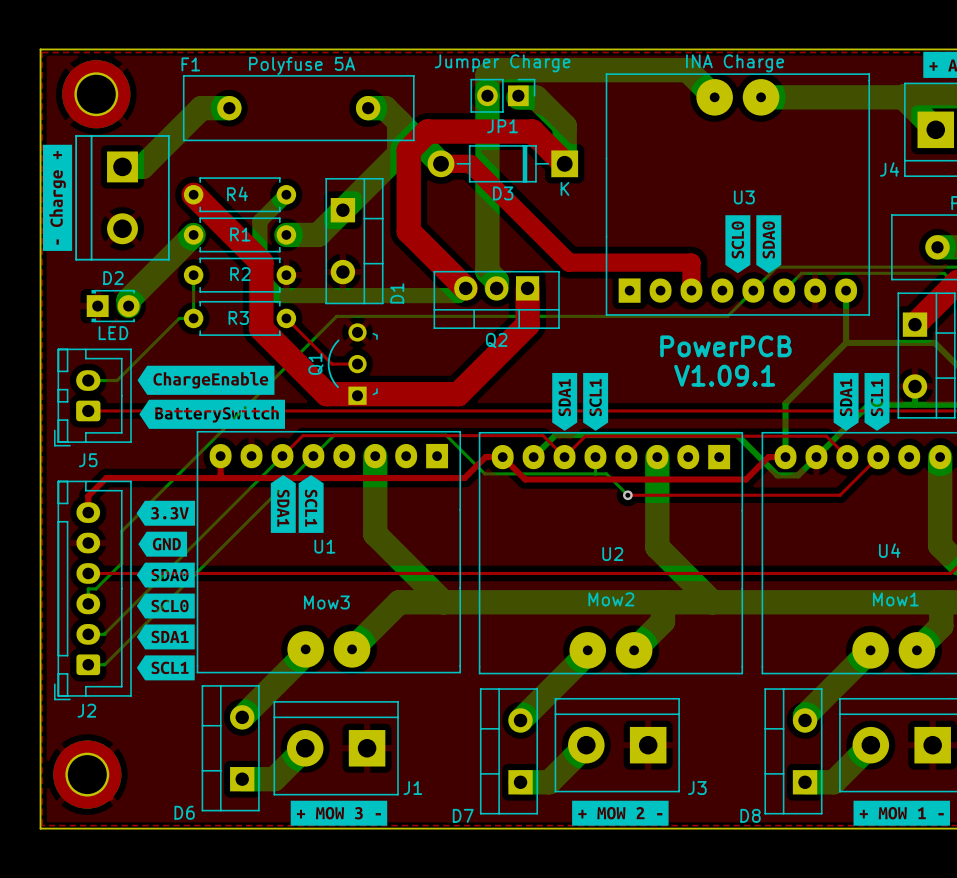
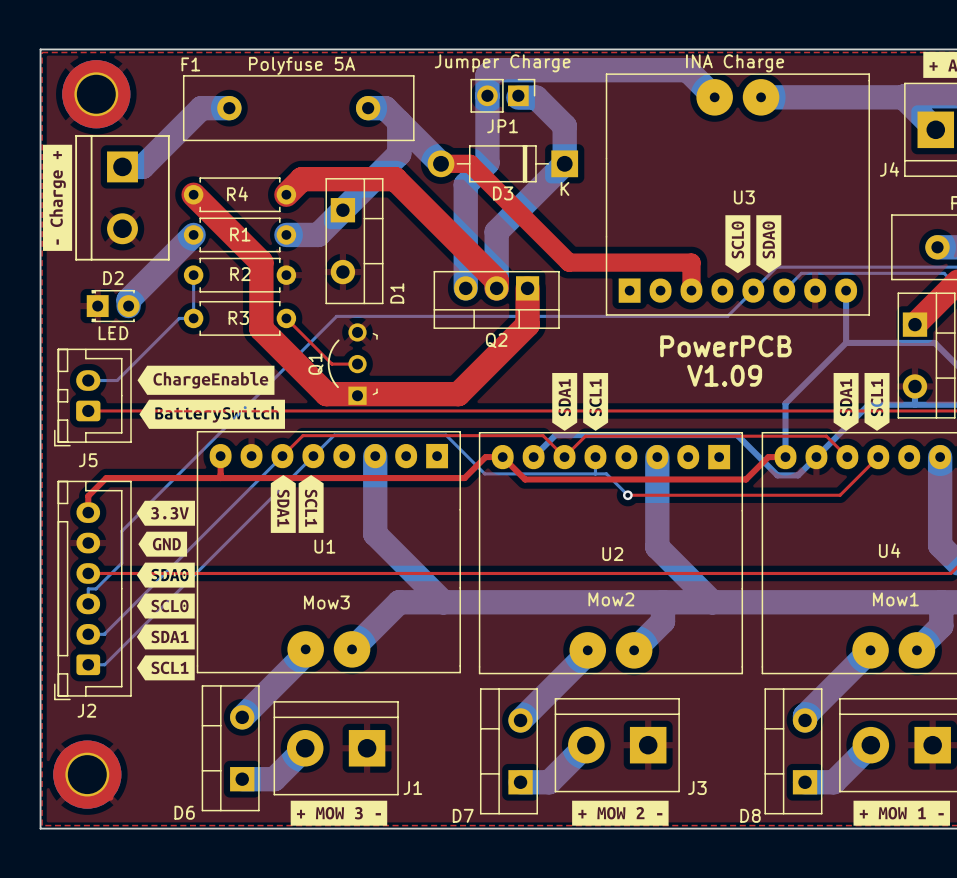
bottom track: (487, 162) (487, 271) (496, 280) -> (487, 162) (465, 184) (465, 288)
top track: (564, 163) (532, 131) (427, 131) (408, 150) (408, 231) (465, 288) -> none
bottom track: none -> (564, 163) (496, 231) (496, 280)
top track: none -> (286, 194) (301, 179) (395, 179) (496, 280) (496, 288)
bottom track: (286, 194) (259, 221) (259, 277) (277, 295) (458, 295) (465, 288) -> none
text: V1.09.1 (724, 375) -> V1.09 (724, 375)

